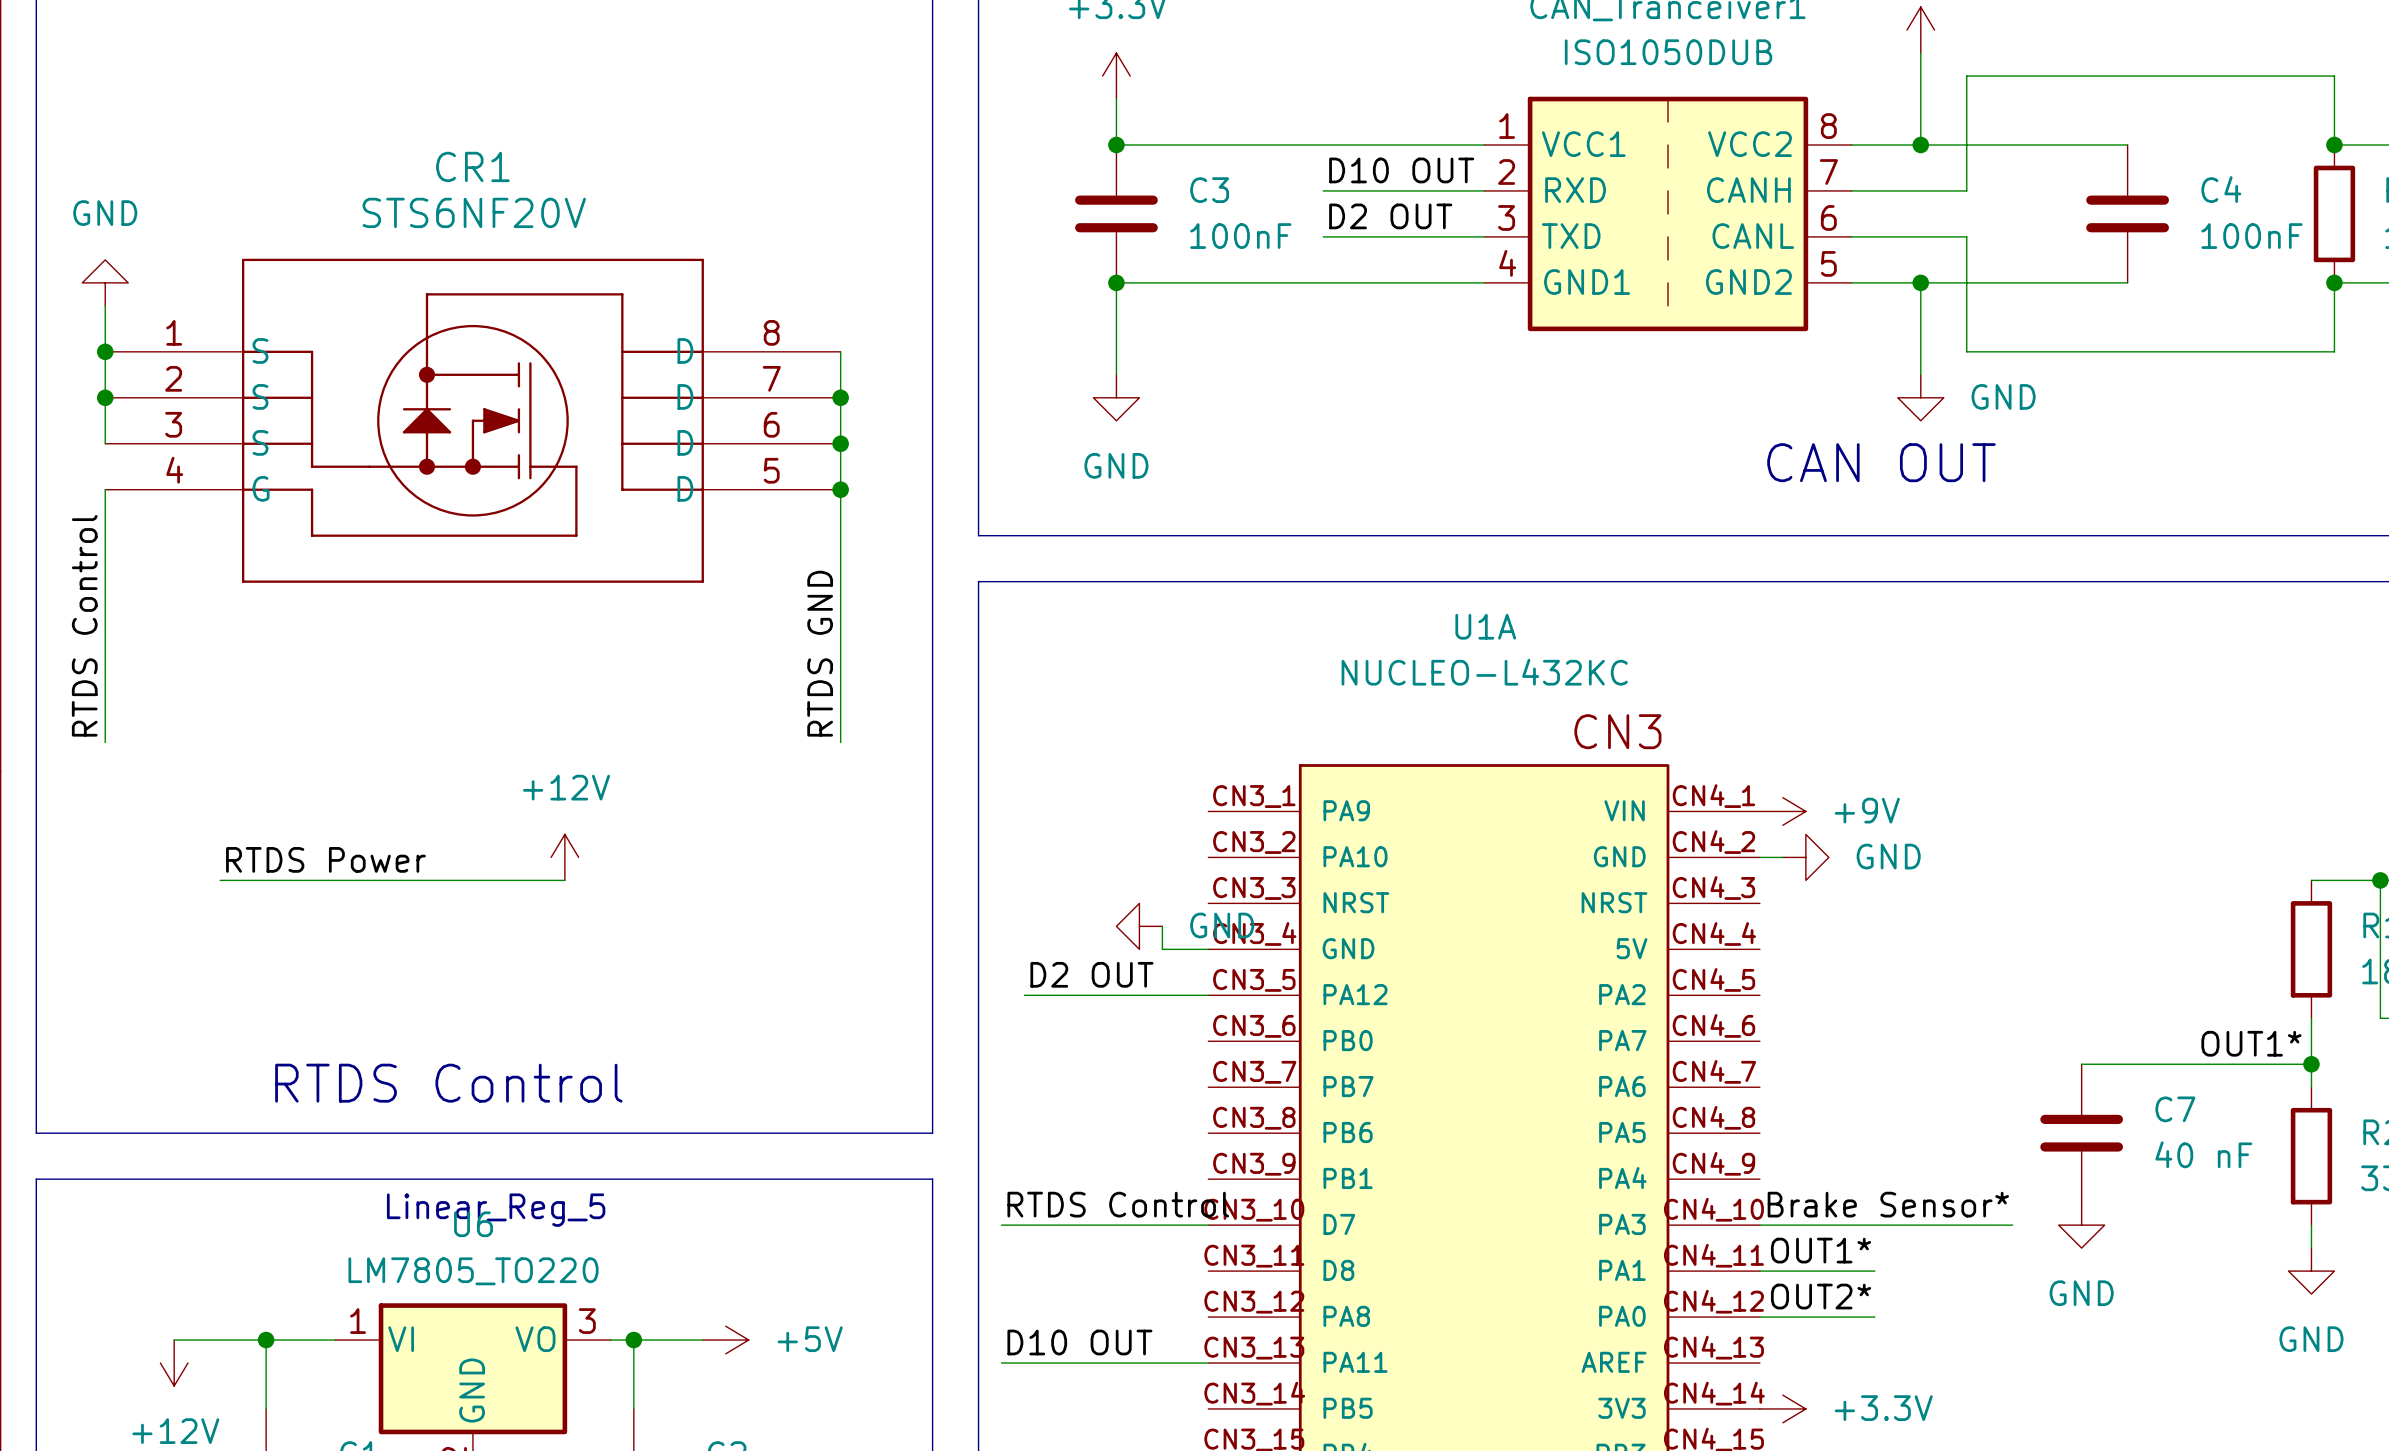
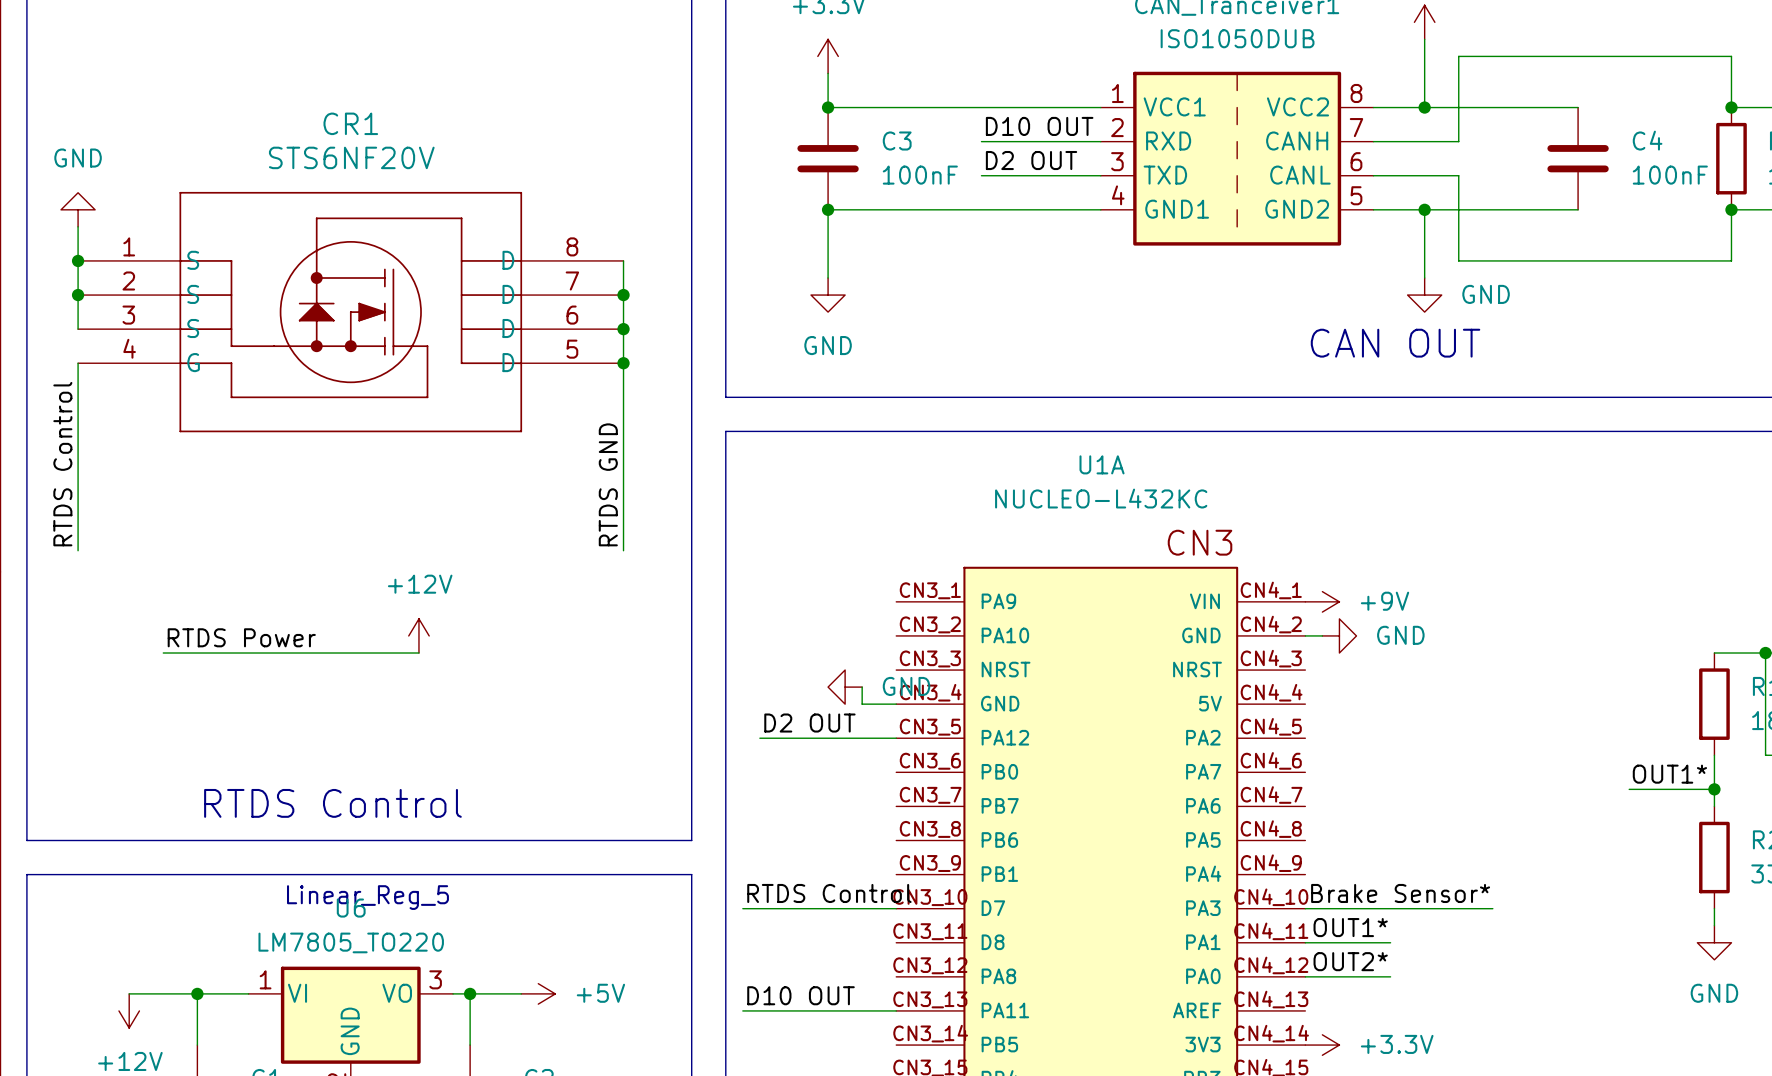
wire: (2081, 1064) (2196, 1064) -> none
C7: 40 nF (2081, 1133) -> none
power symbol: GND (2081, 1225) -> none

